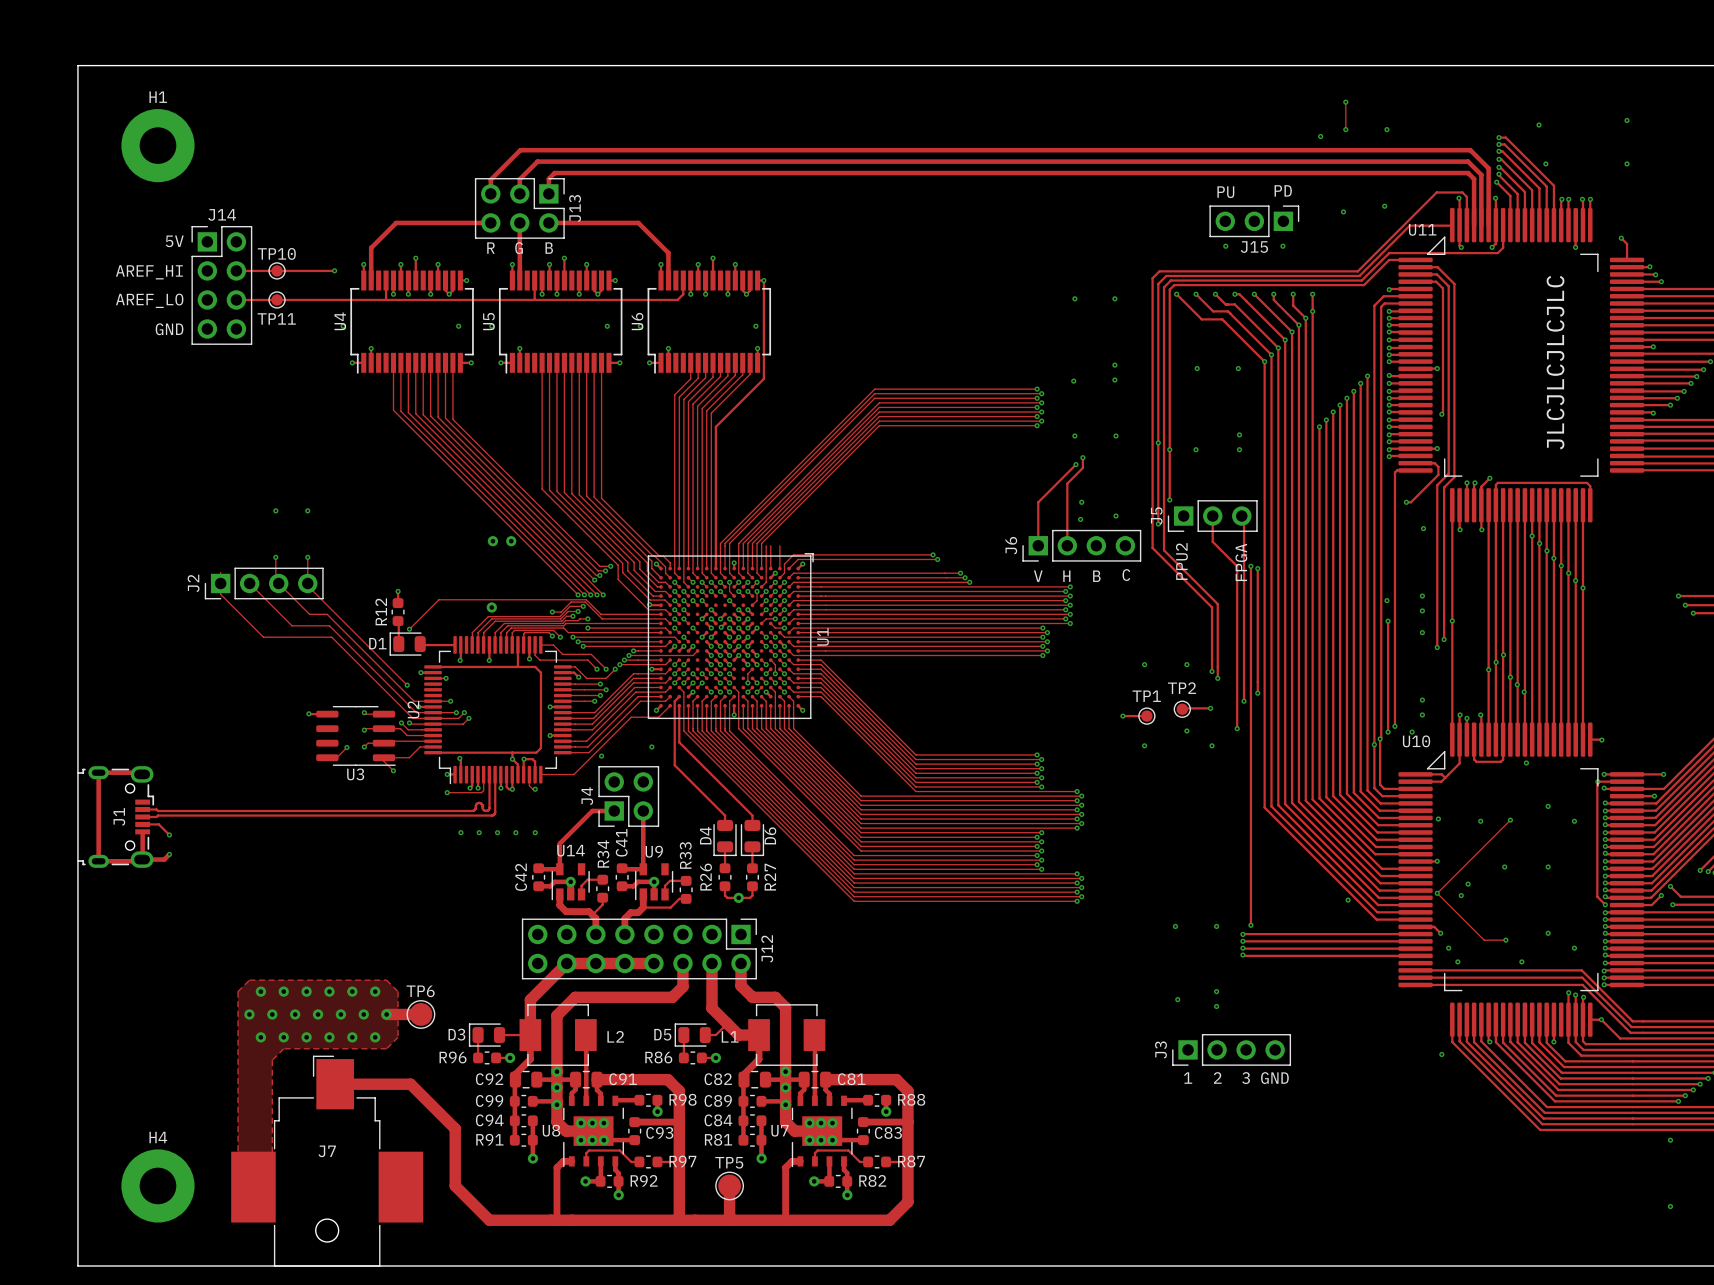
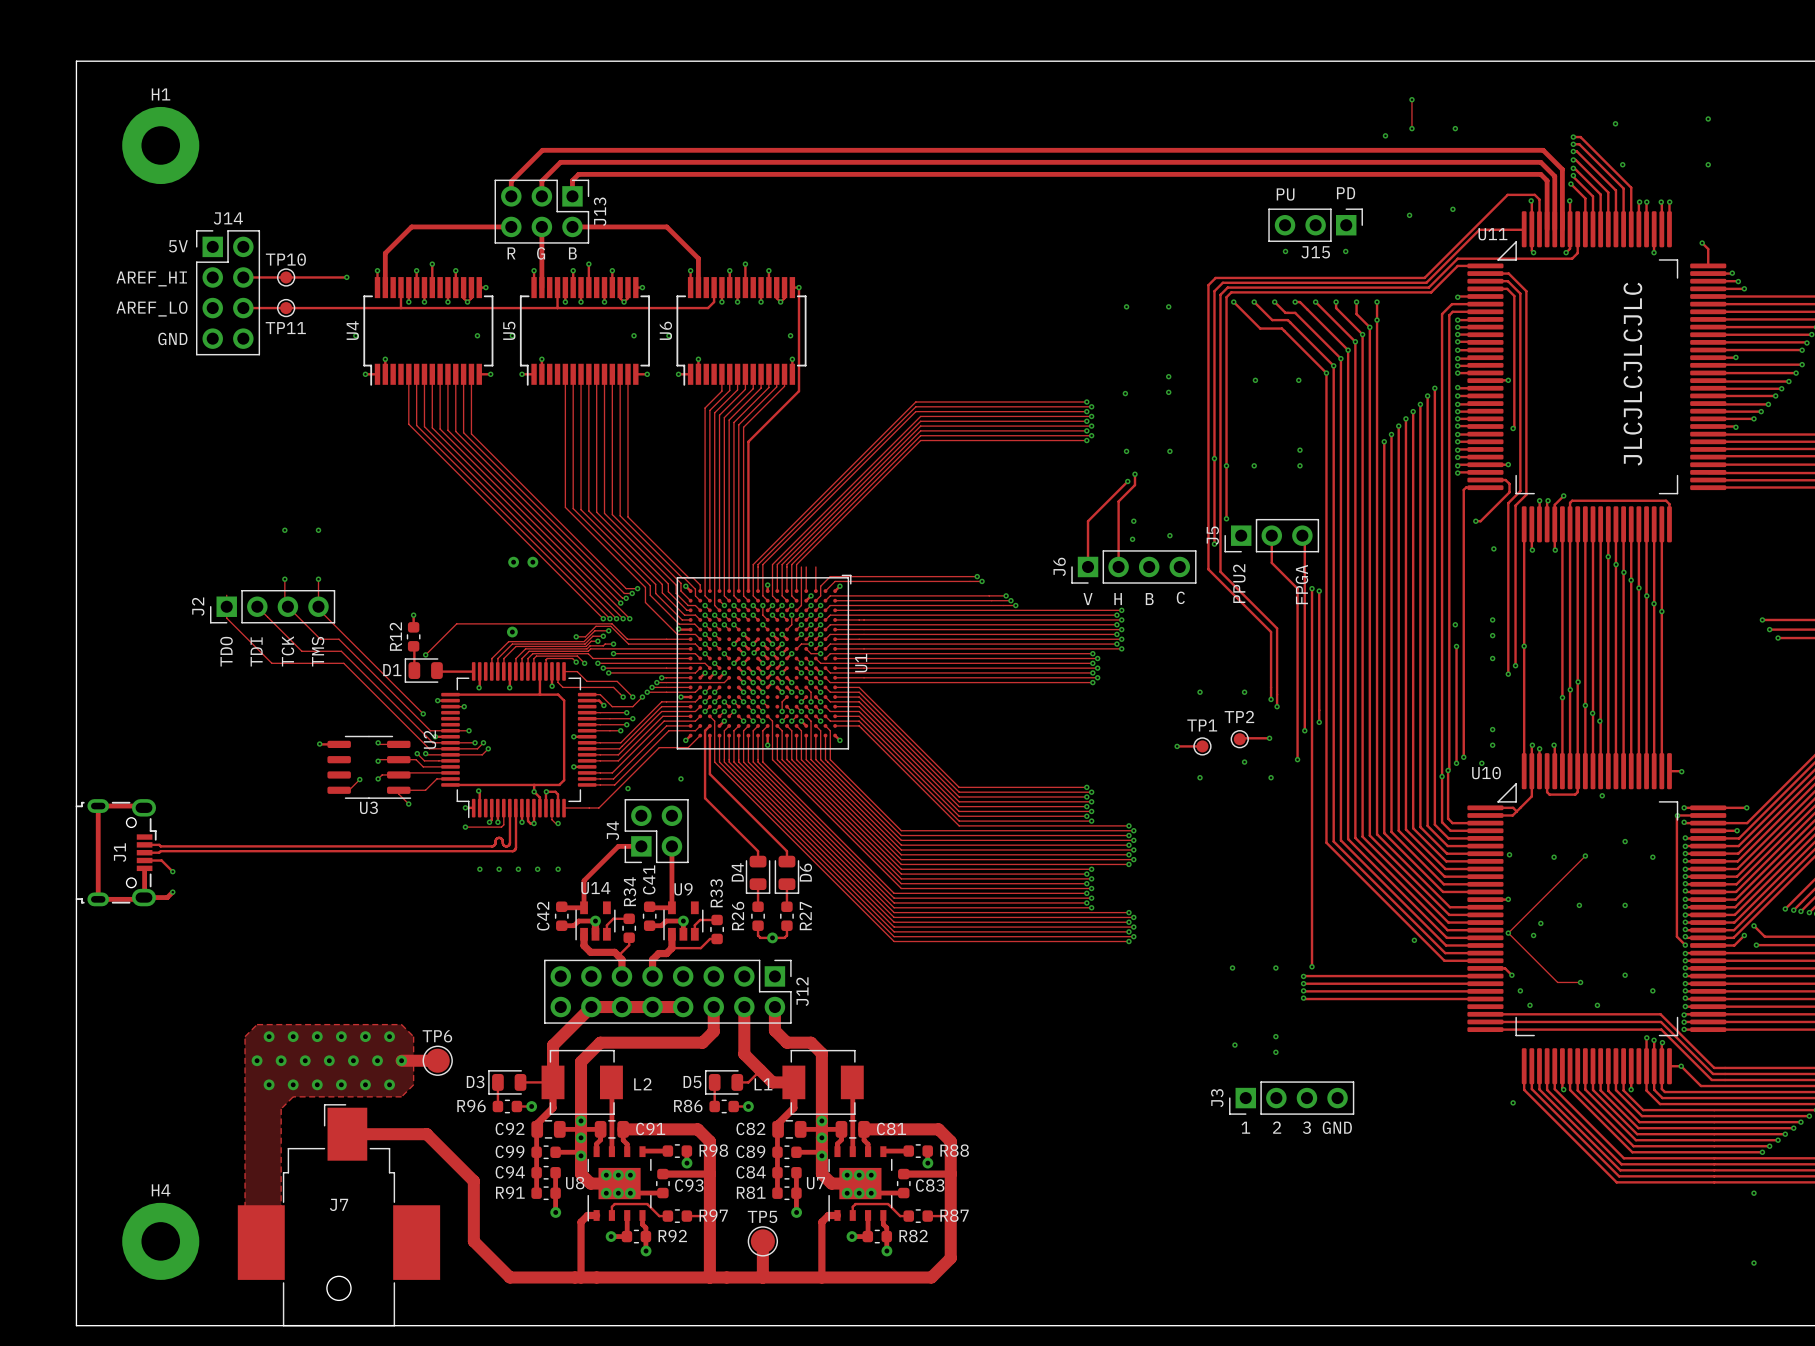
text: none -> TCK (287, 651)
text: none -> TDO (226, 651)
text: none -> TDI (256, 651)
text: none -> TMS (318, 651)

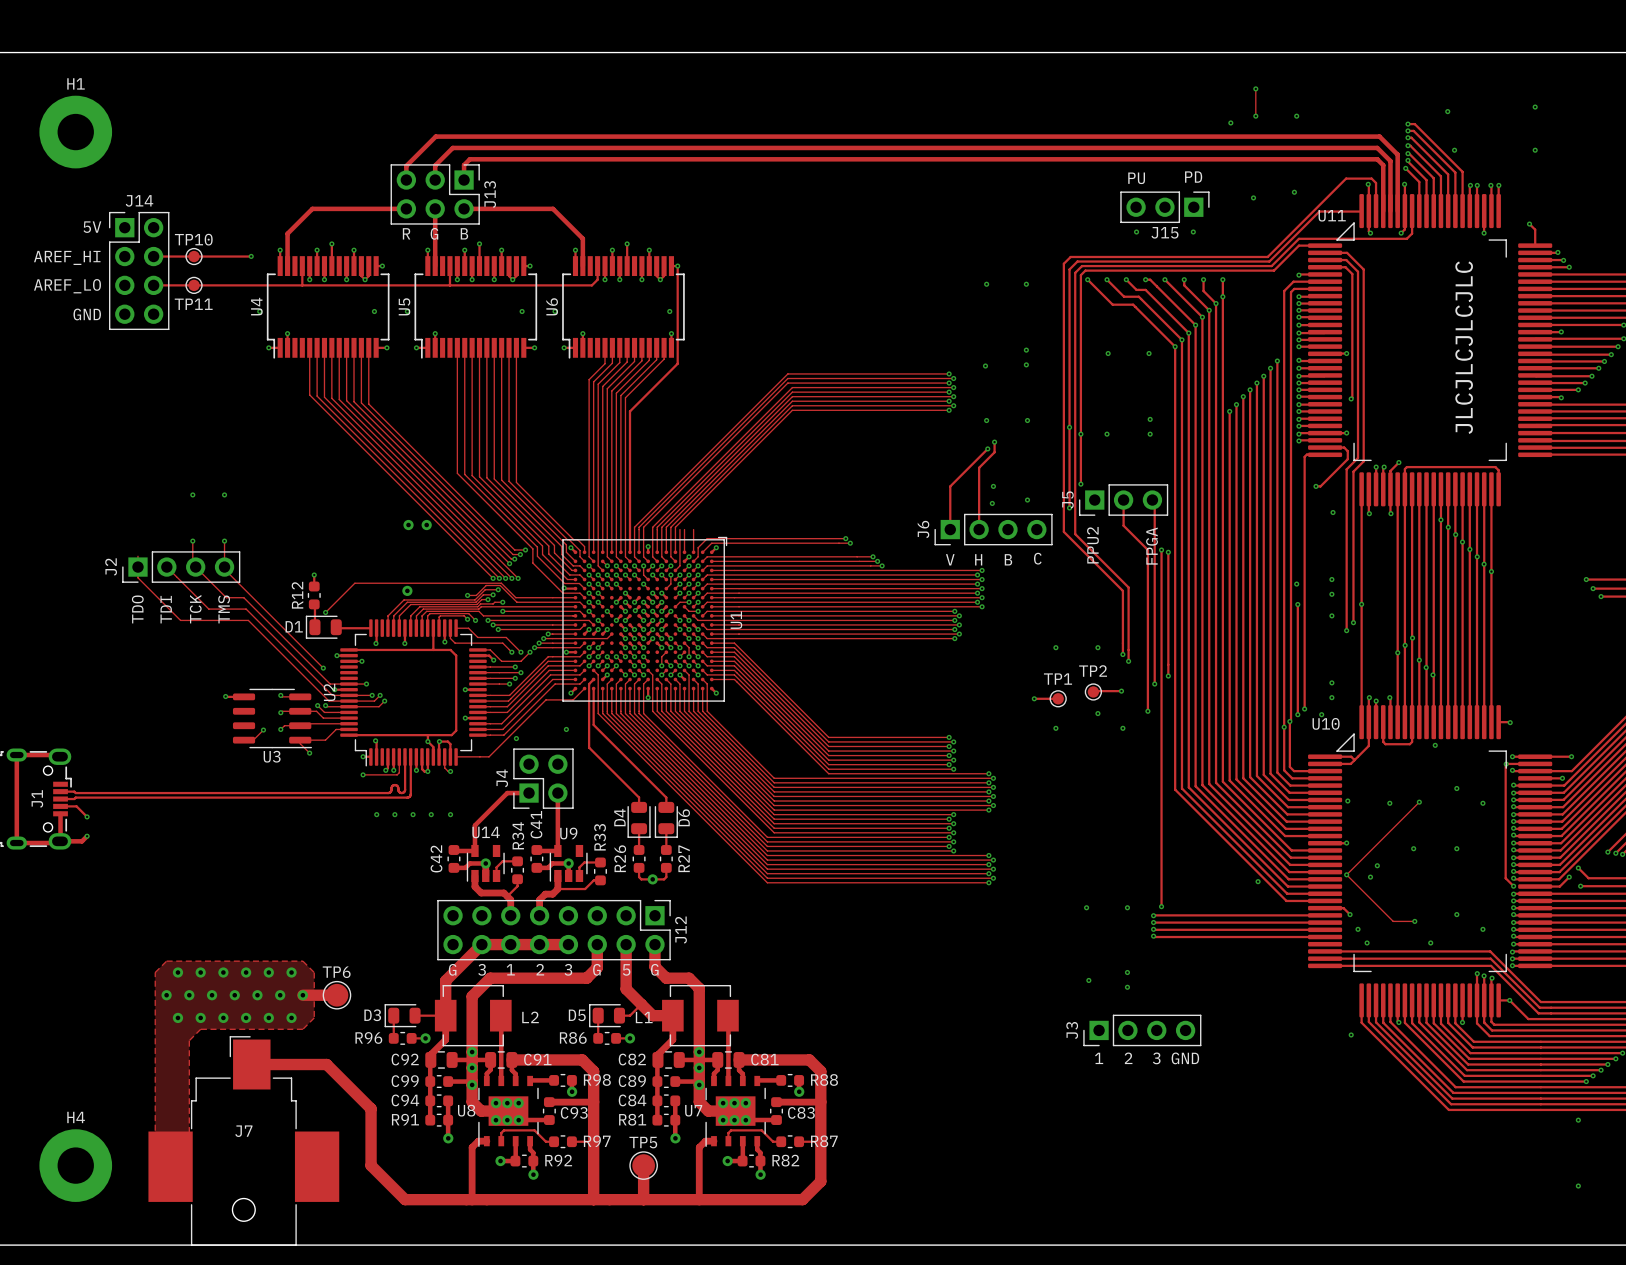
text: none -> G (452, 969)
text: none -> 3 (482, 969)
text: none -> 1 (510, 969)
text: none -> 2 (540, 969)
text: none -> 3 (568, 969)
text: none -> G (596, 969)
text: none -> 5 (626, 969)
text: none -> G (654, 969)

